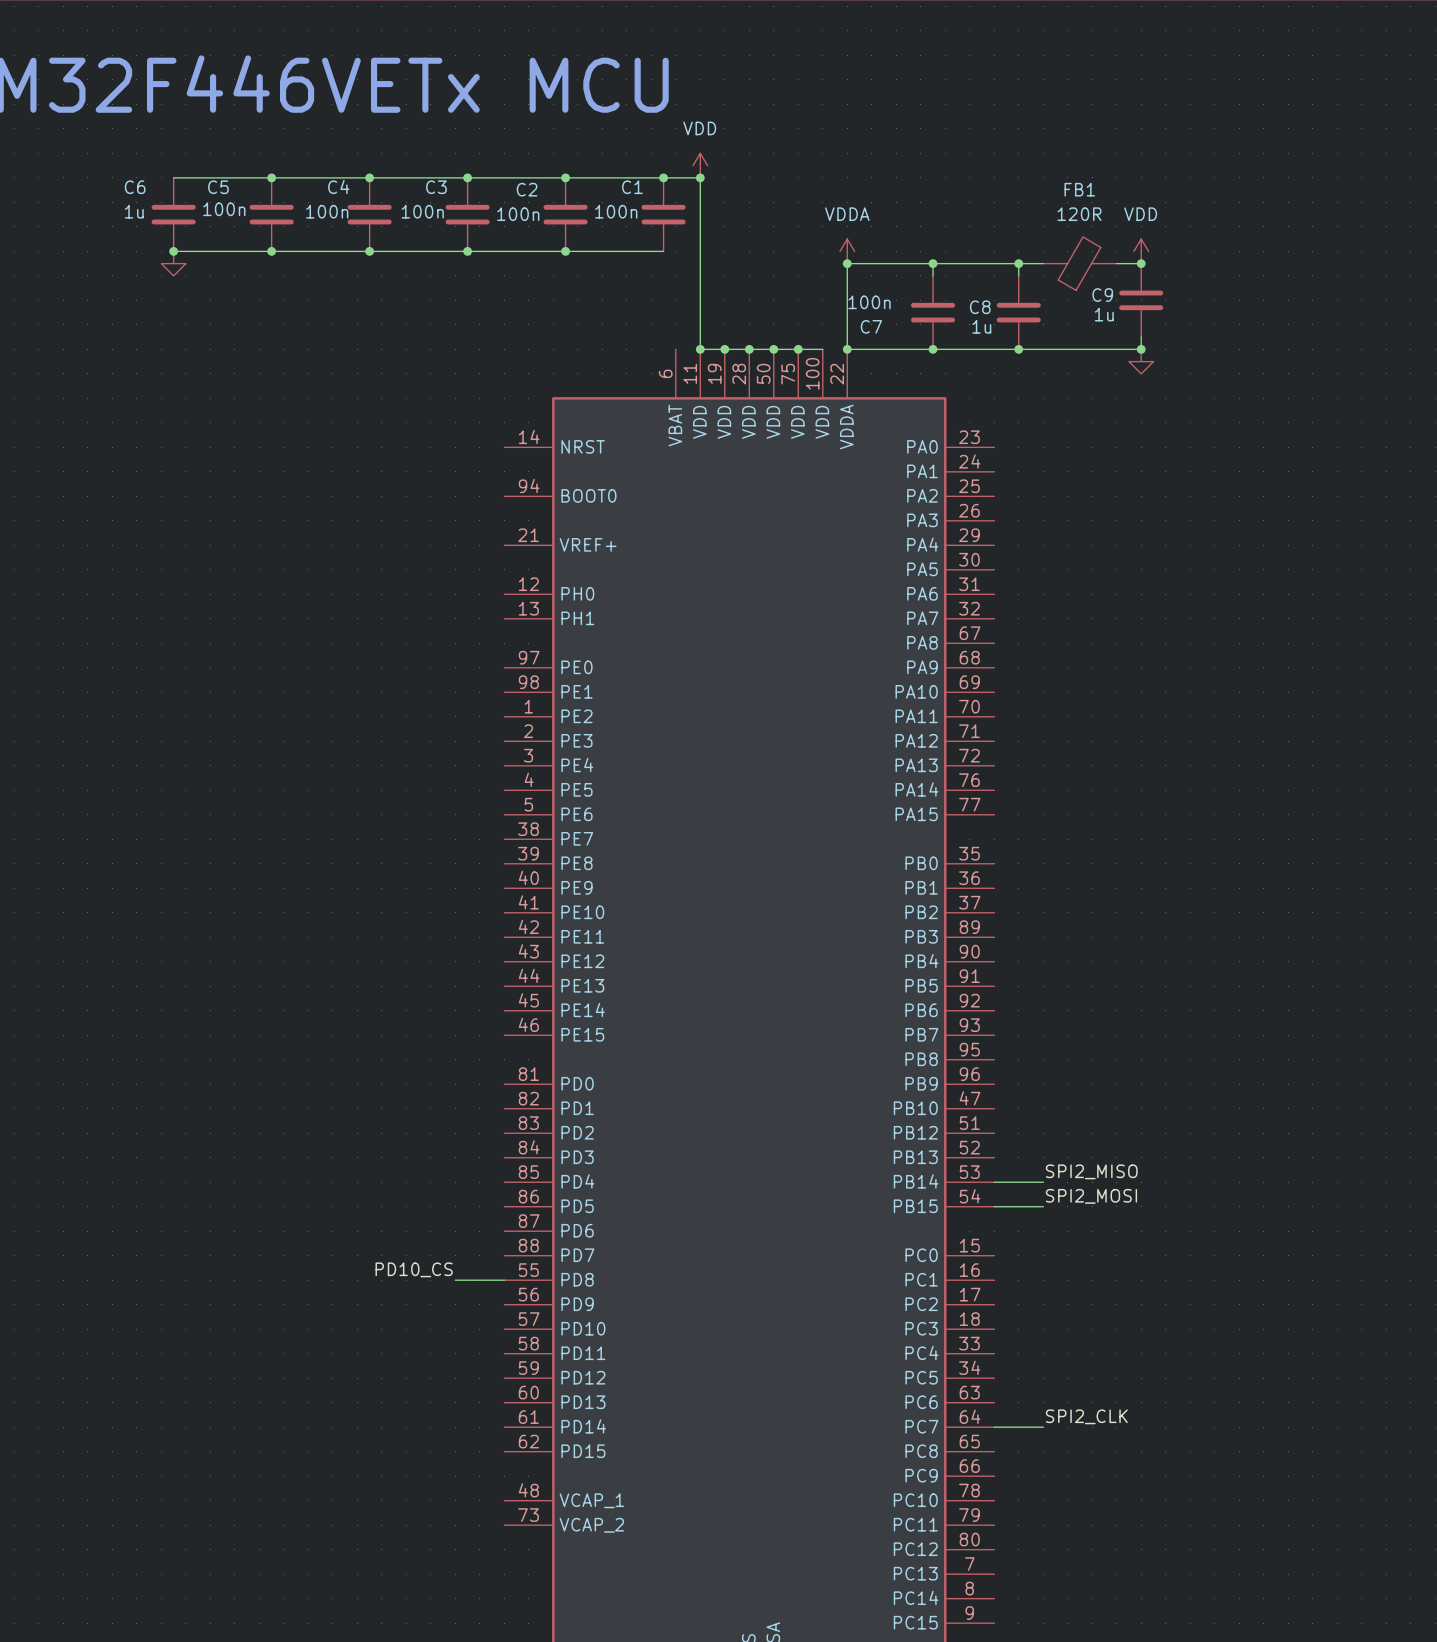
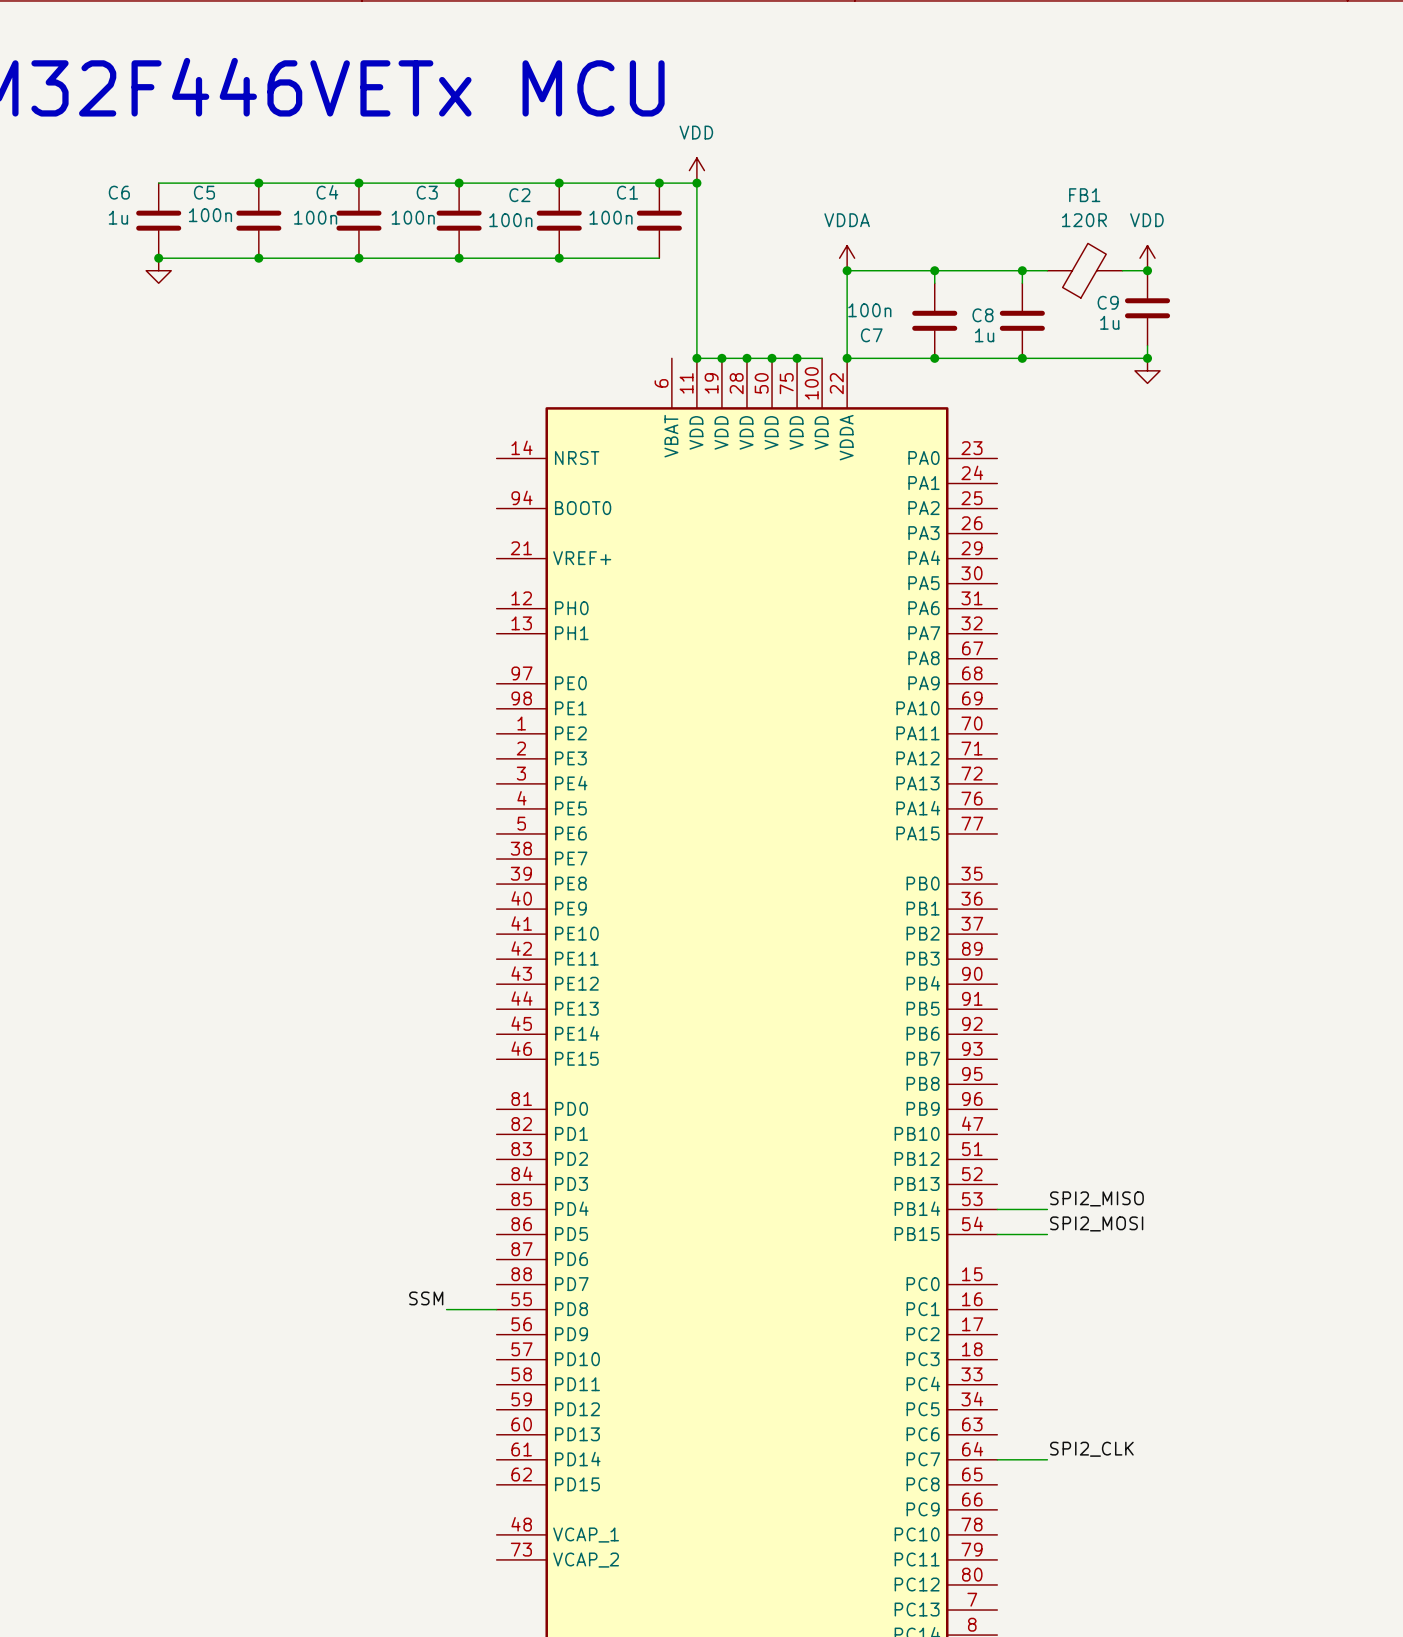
label: PD10_CS (414, 1269) -> SSM (426, 1298)

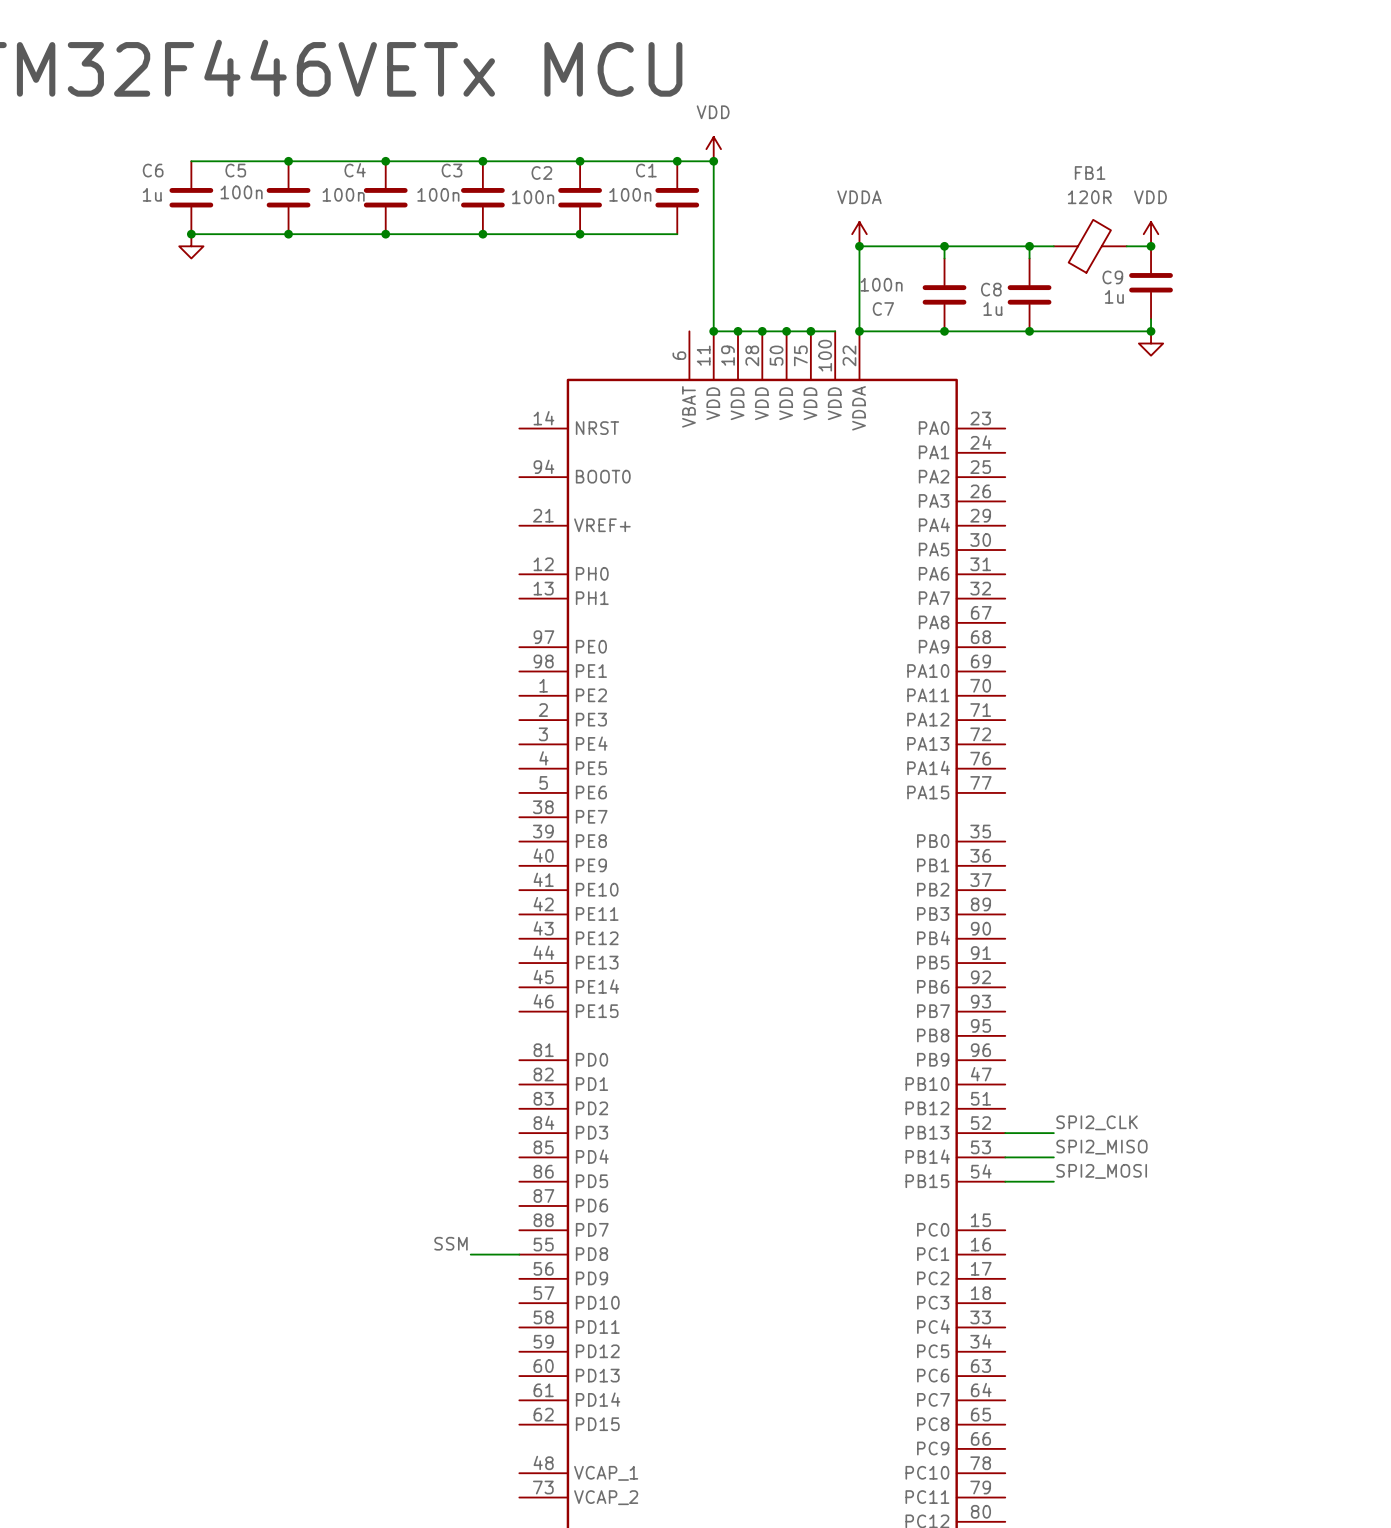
label: none -> SPI2_CLK (1097, 1122)
wire: none -> (1005, 1133) (1053, 1133)
label: SPI2_CLK (1091, 1449) -> none
wire: (997, 1459) (1047, 1459) -> none

